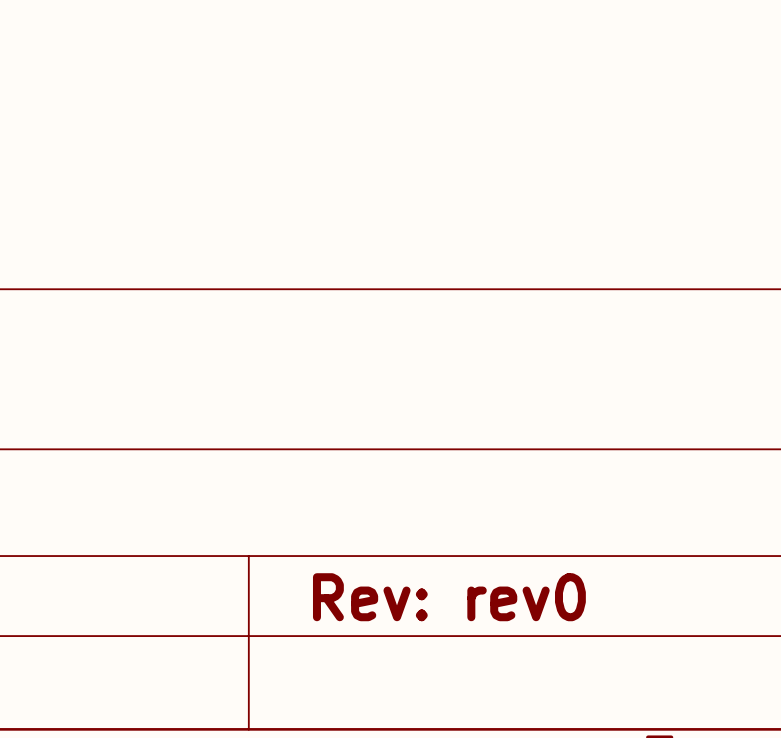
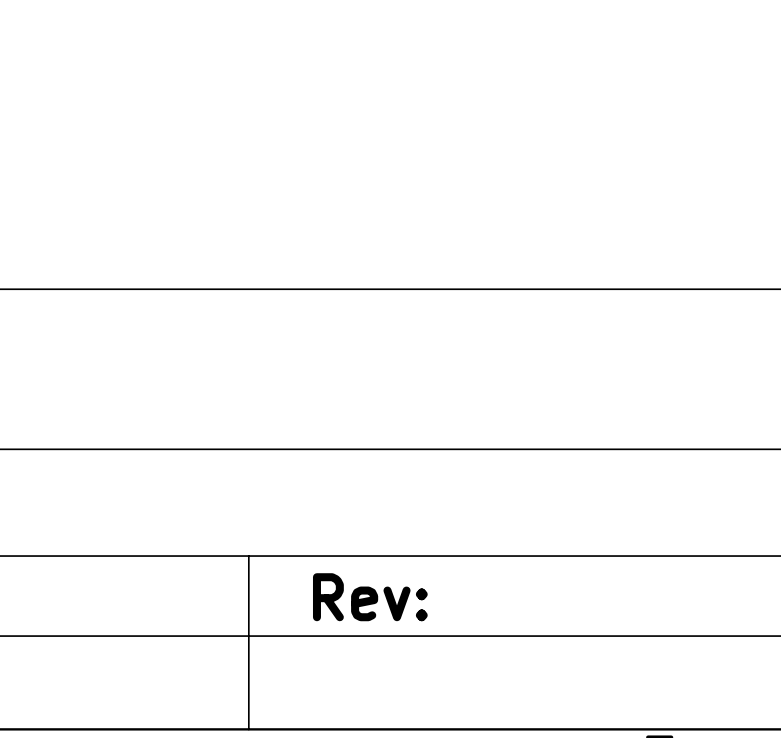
title block: Rev: rev0 (449, 597) -> Rev: (370, 597)

